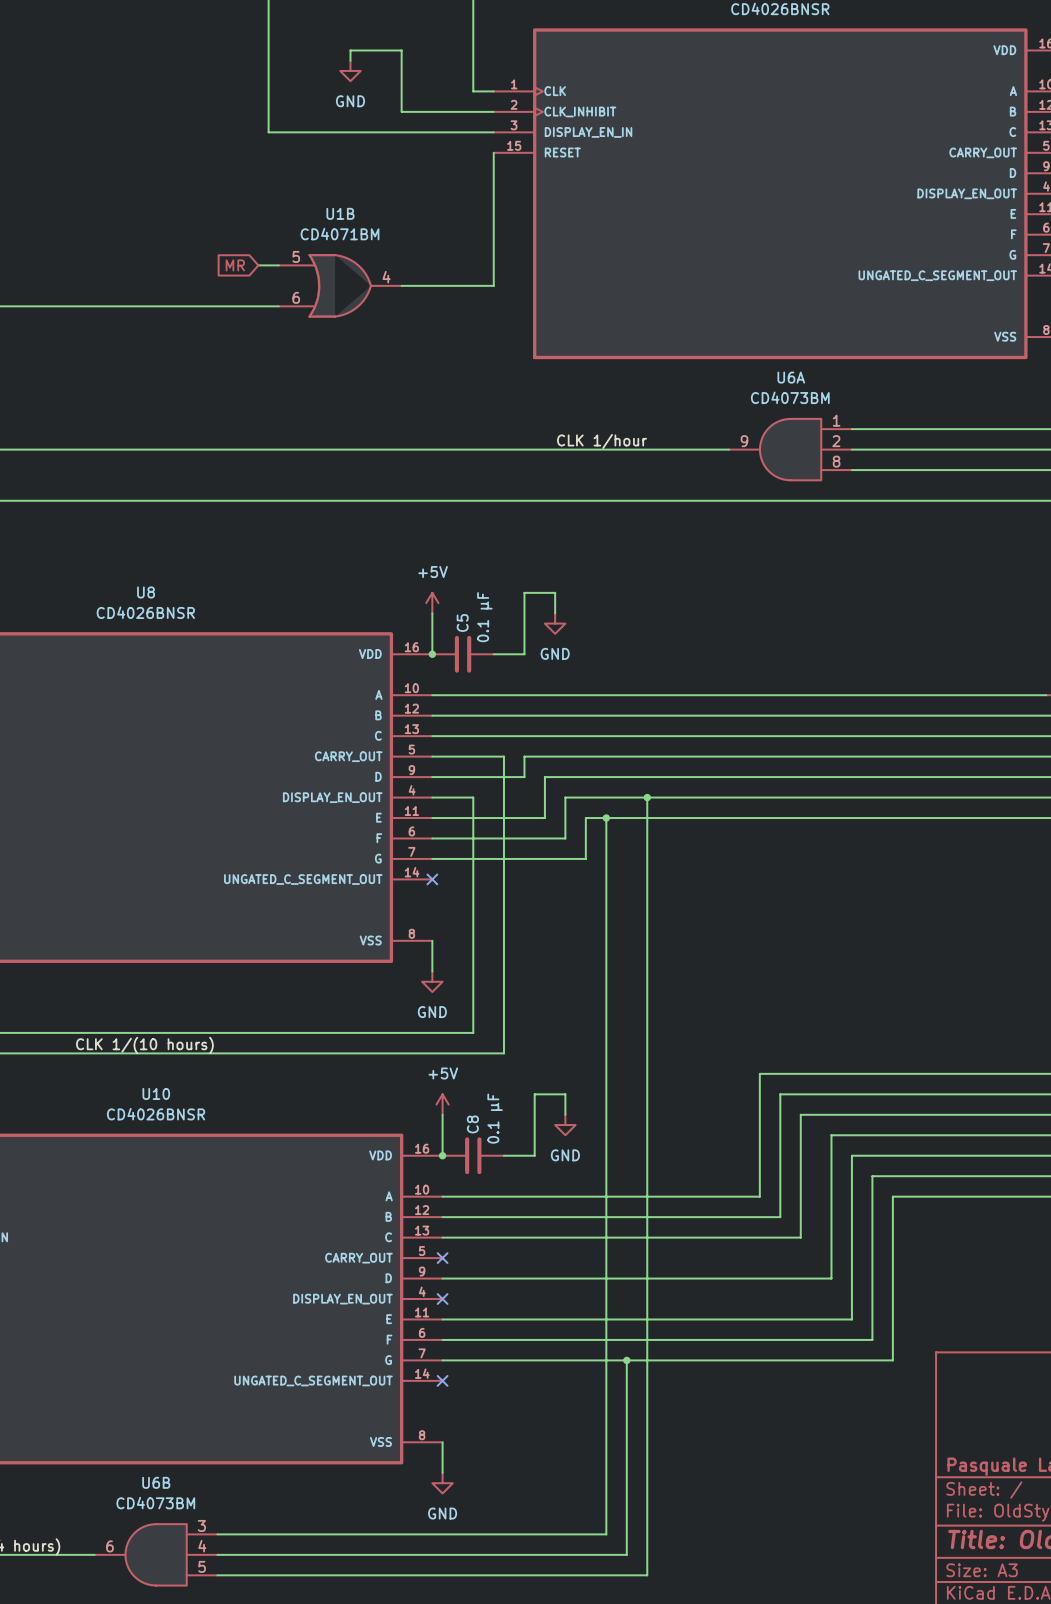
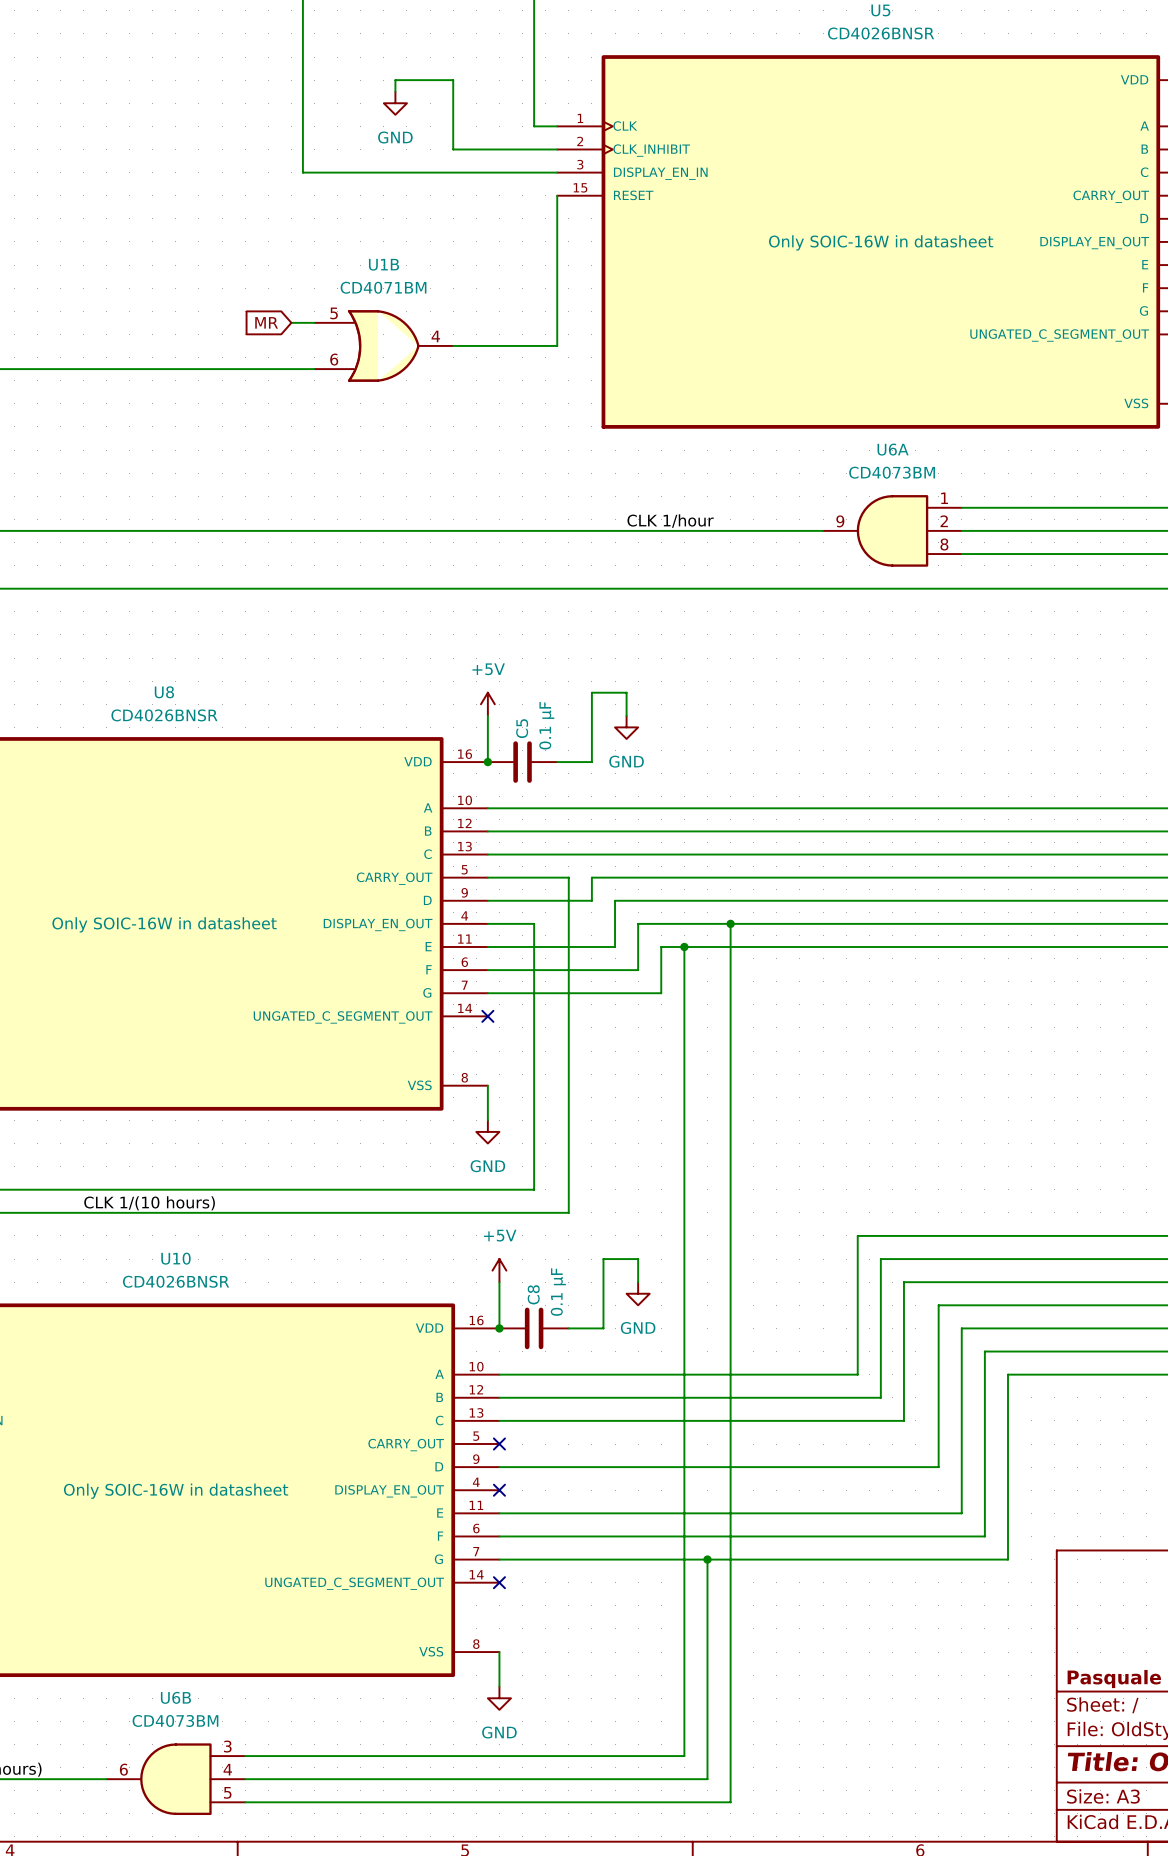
U5 text: none -> Only SOIC-16W in datasheet (881, 242)
U8 text: none -> Only SOIC-16W in datasheet (164, 924)
U10 text: none -> Only SOIC-16W in datasheet (176, 1491)

